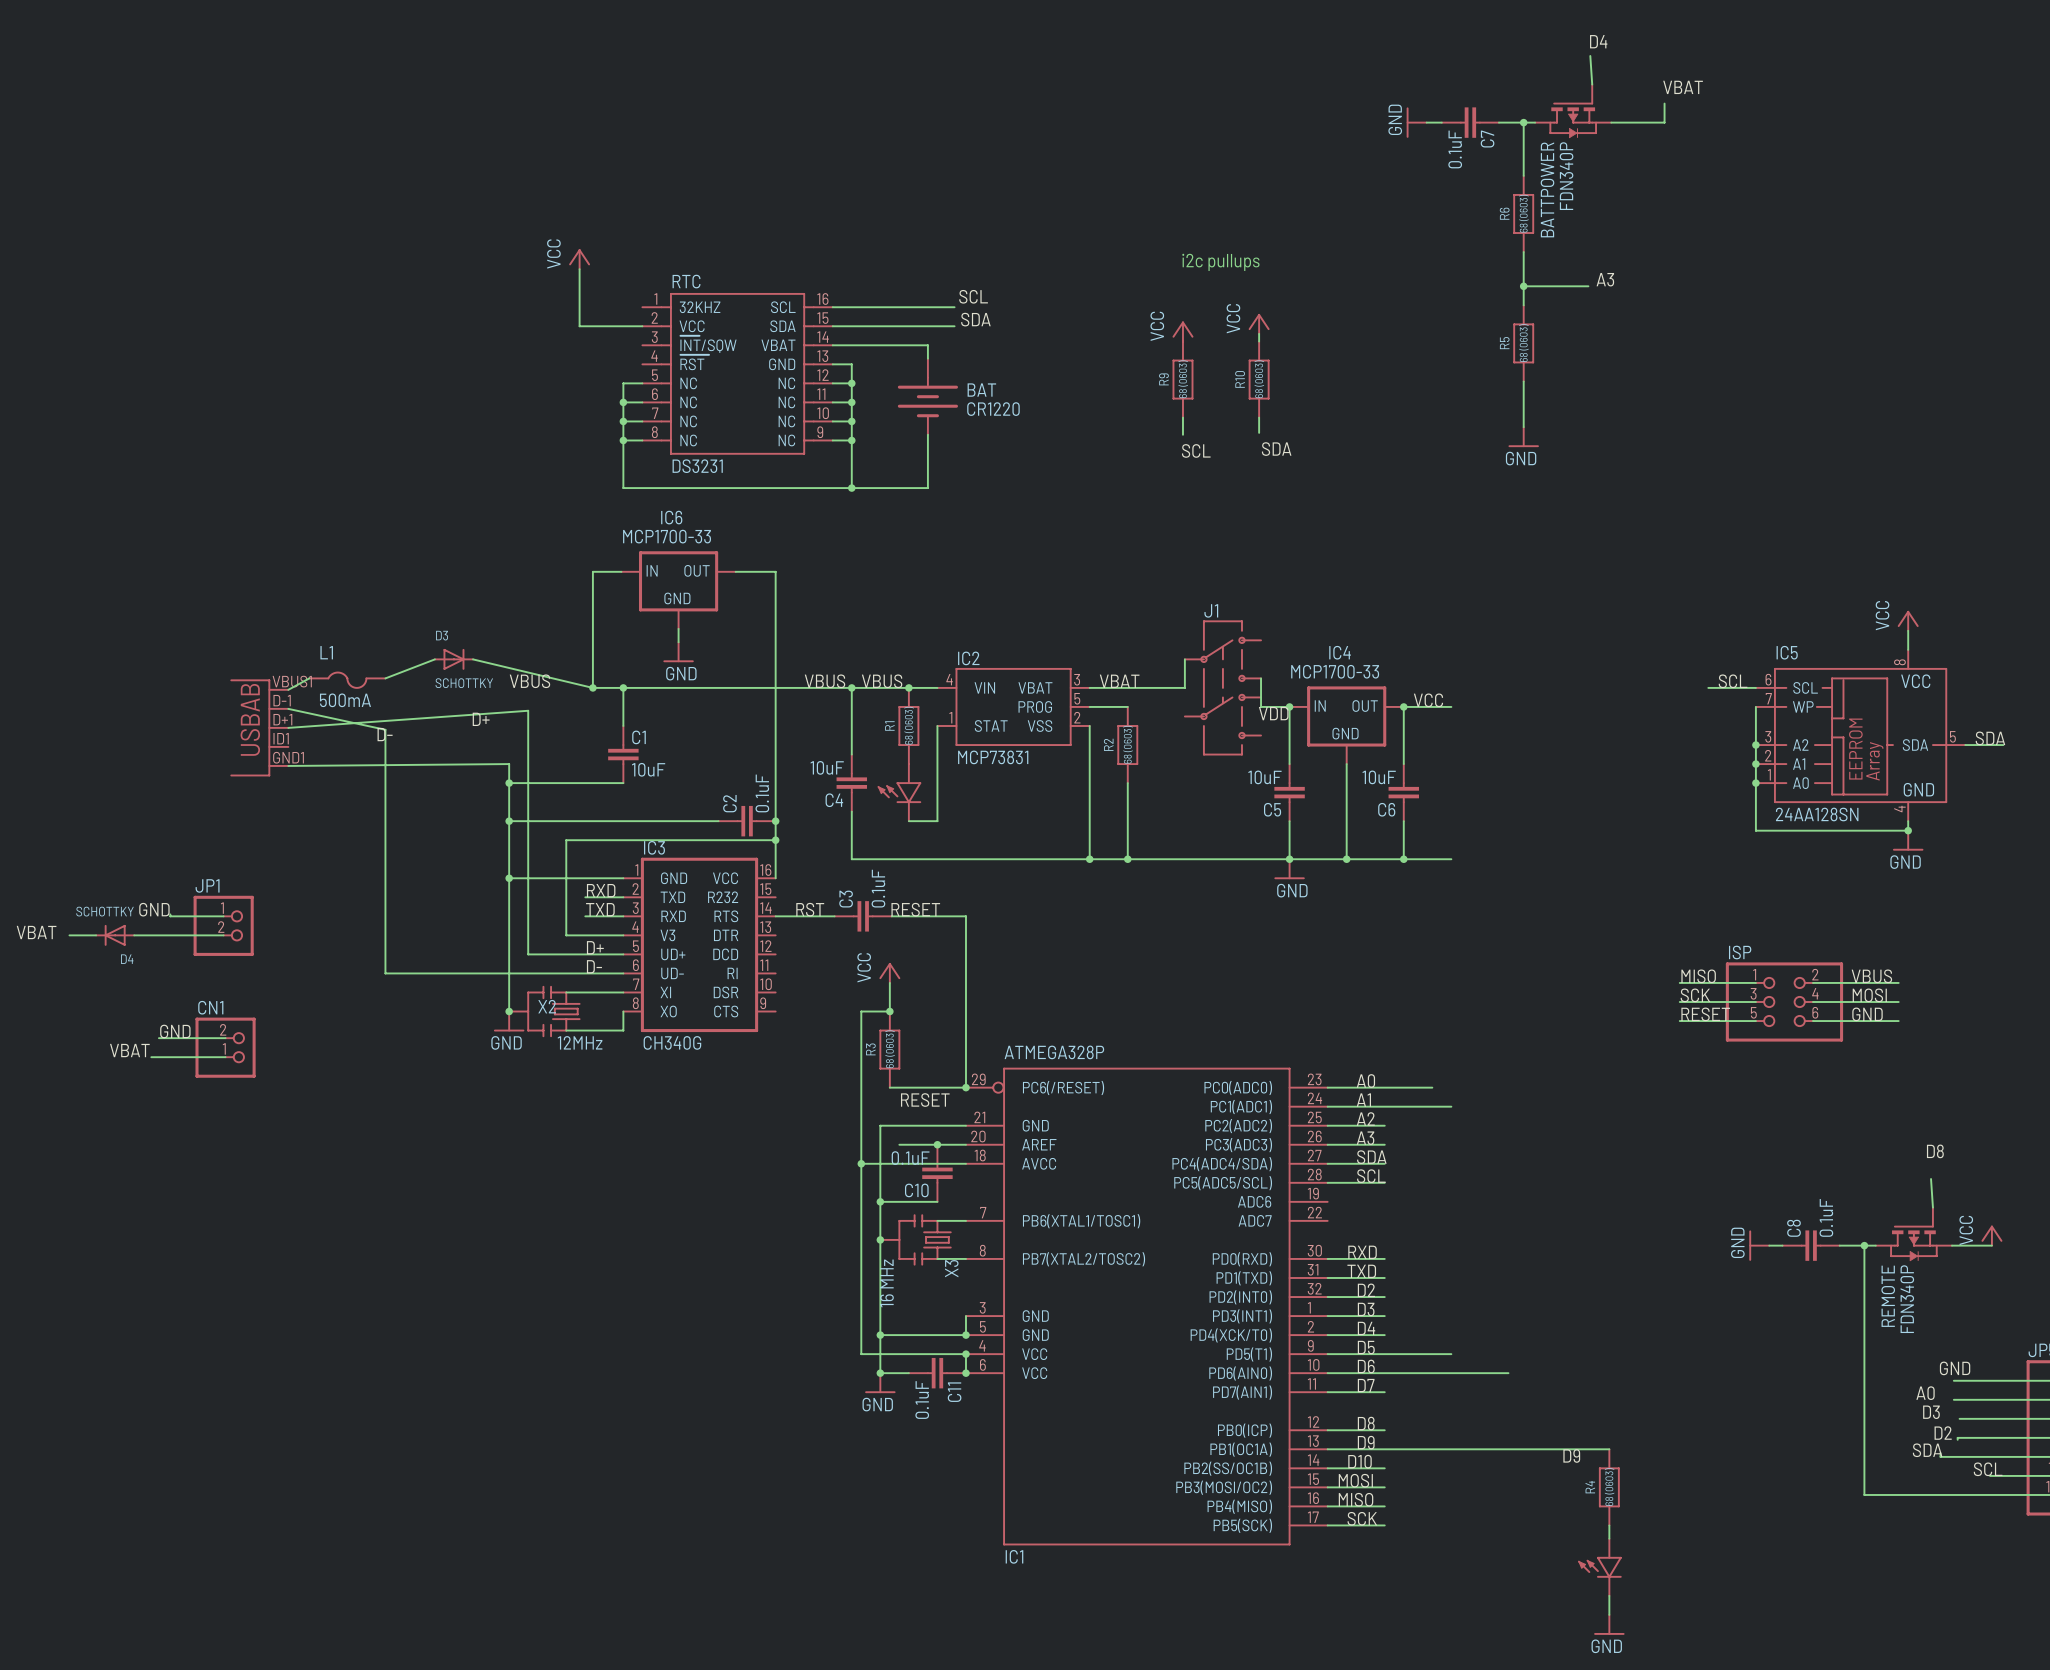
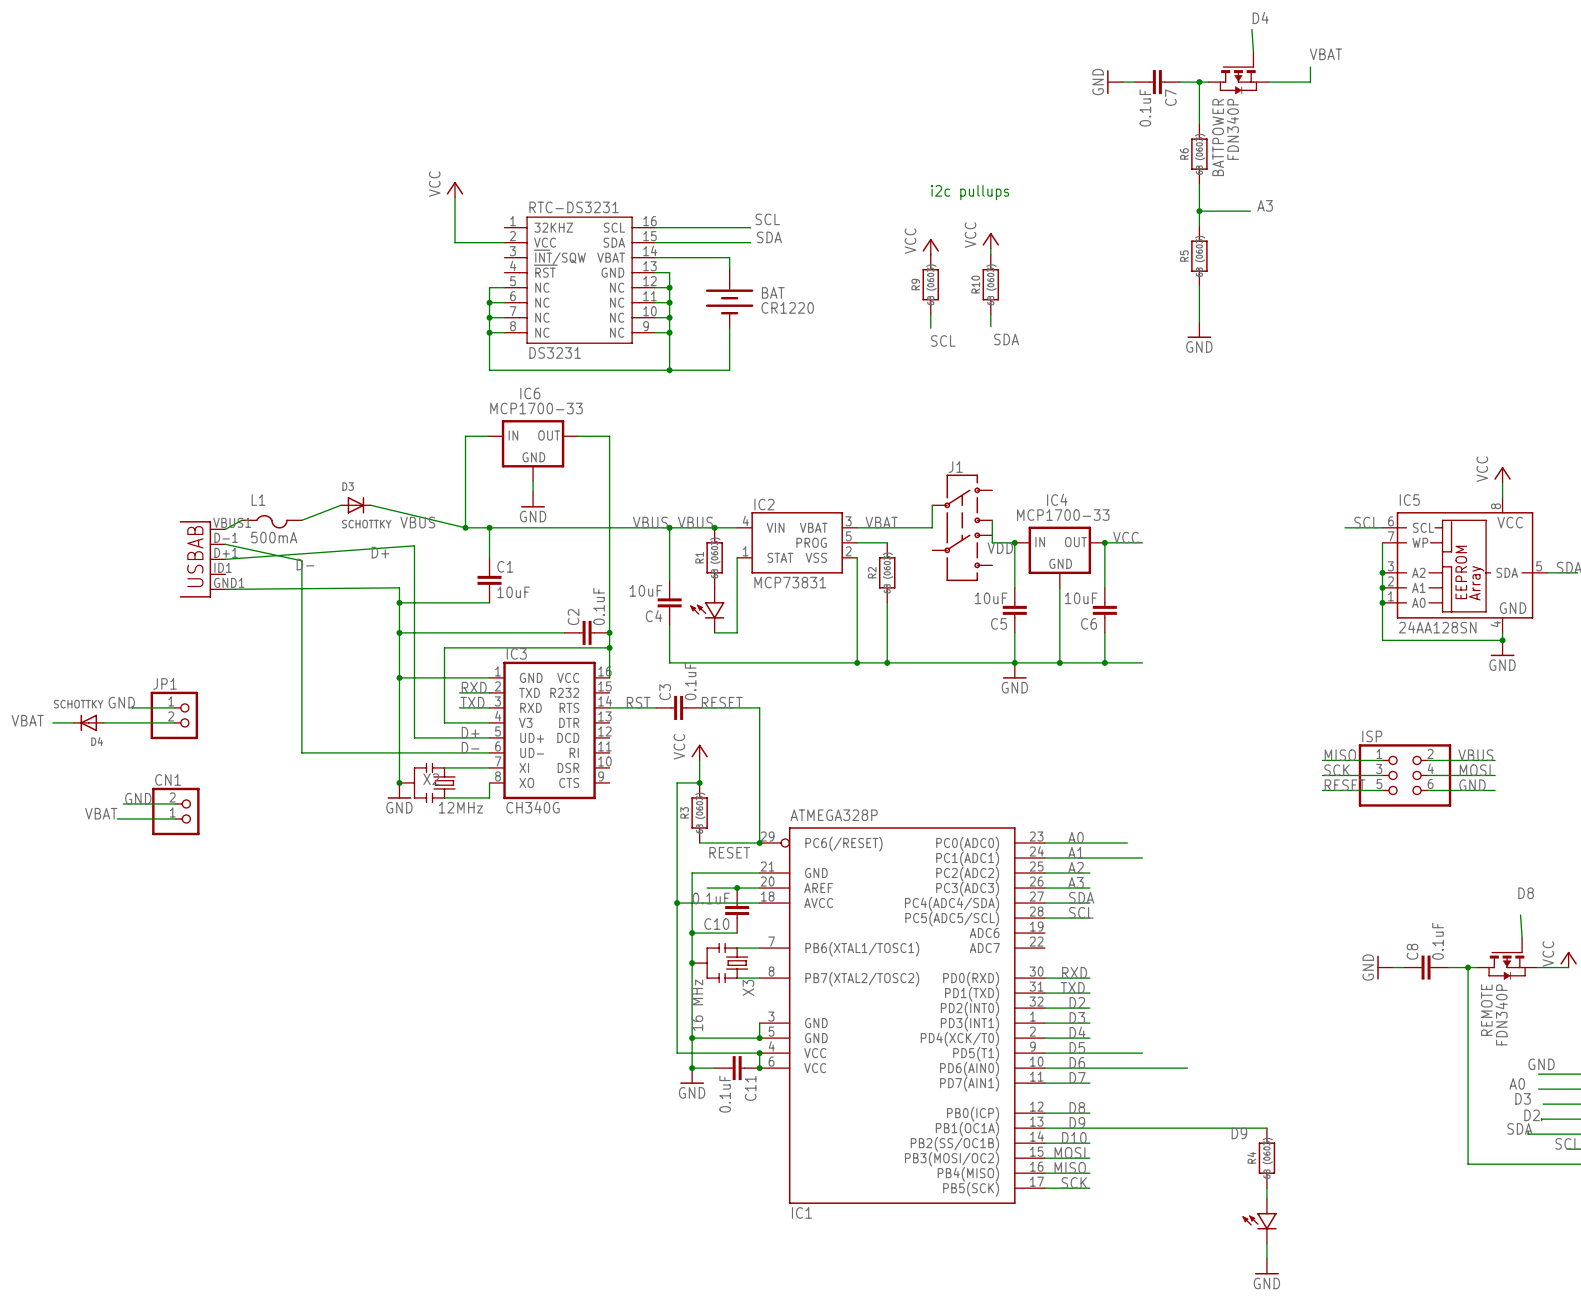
RTC name: RTC (686, 281) -> RTC-DS3231 (574, 207)

